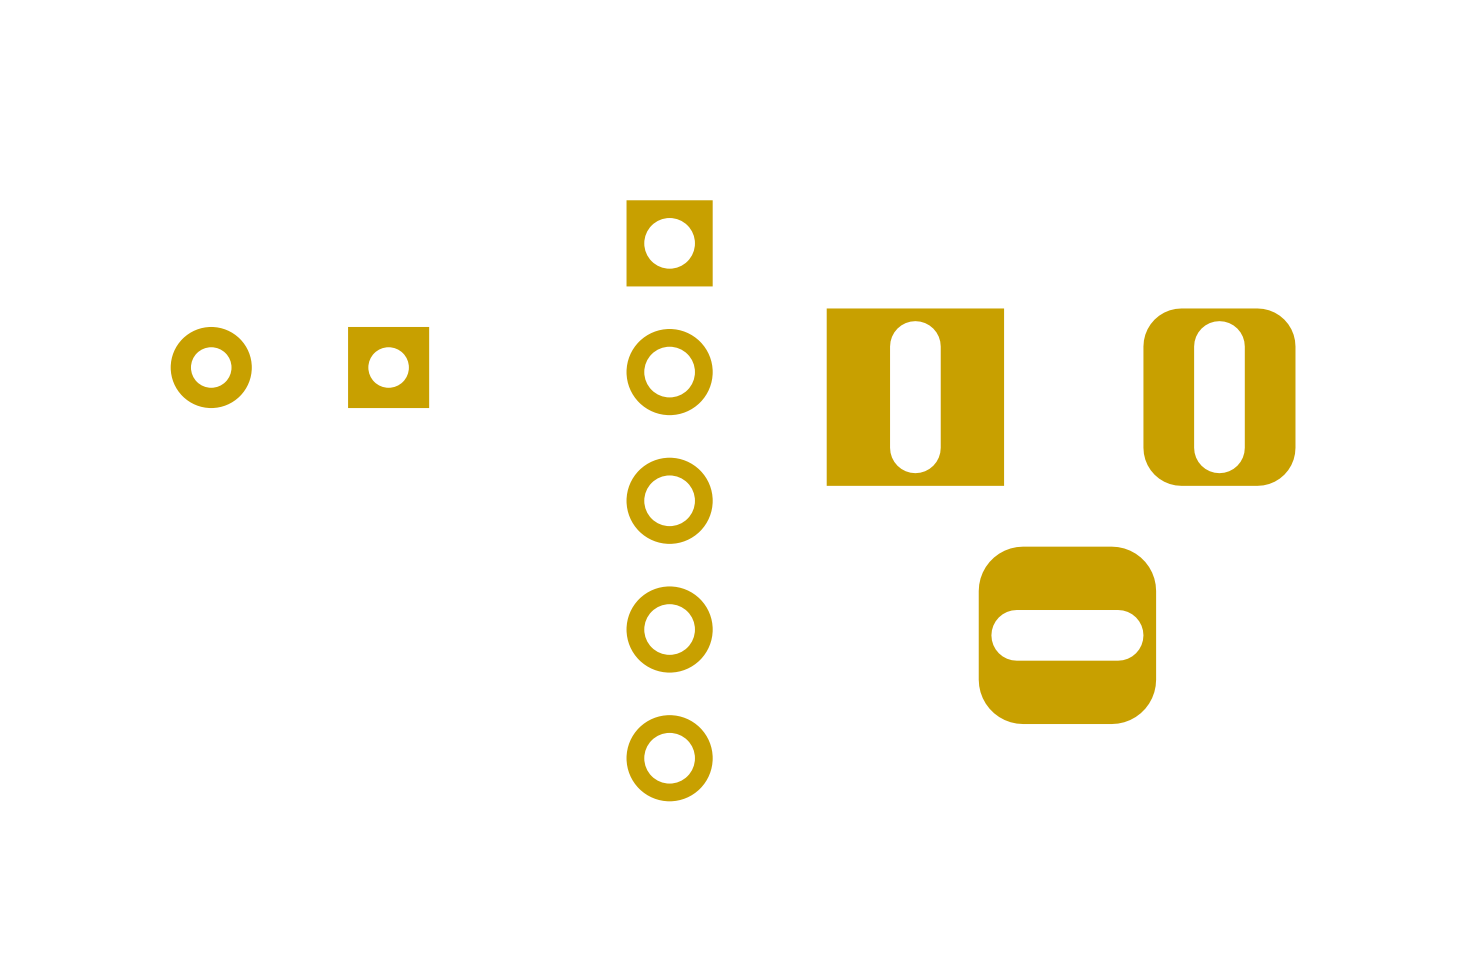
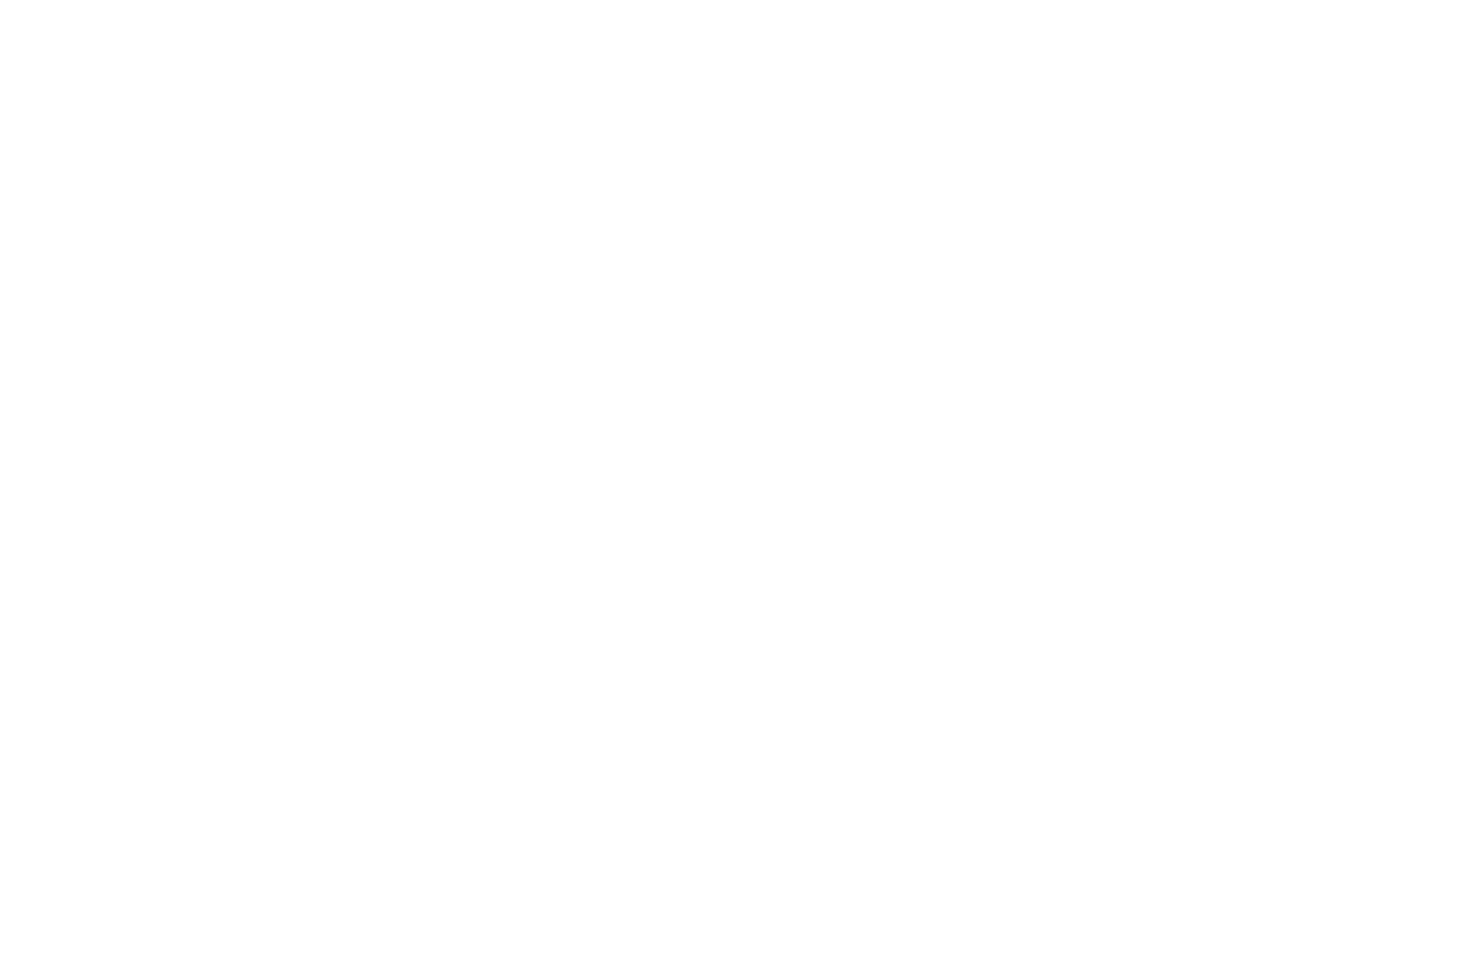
part: (299, 367) -> none
part: (669, 500) -> none
part: (1061, 516) -> none

